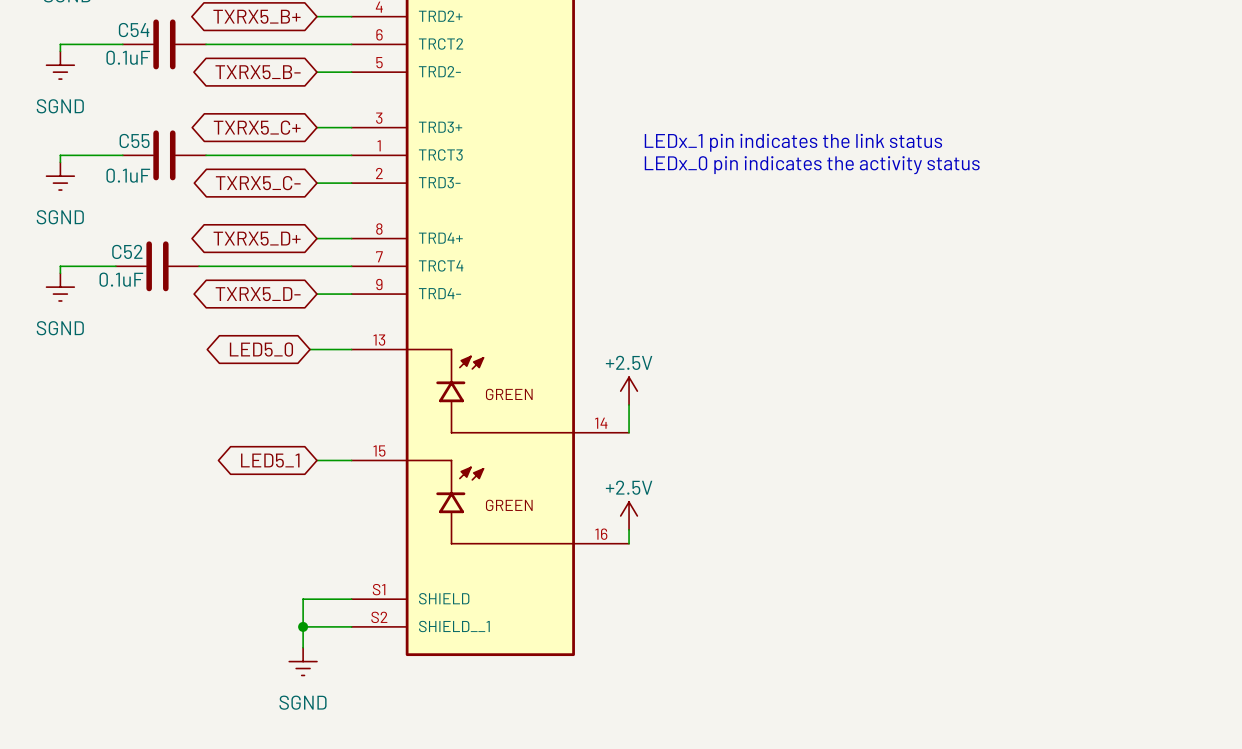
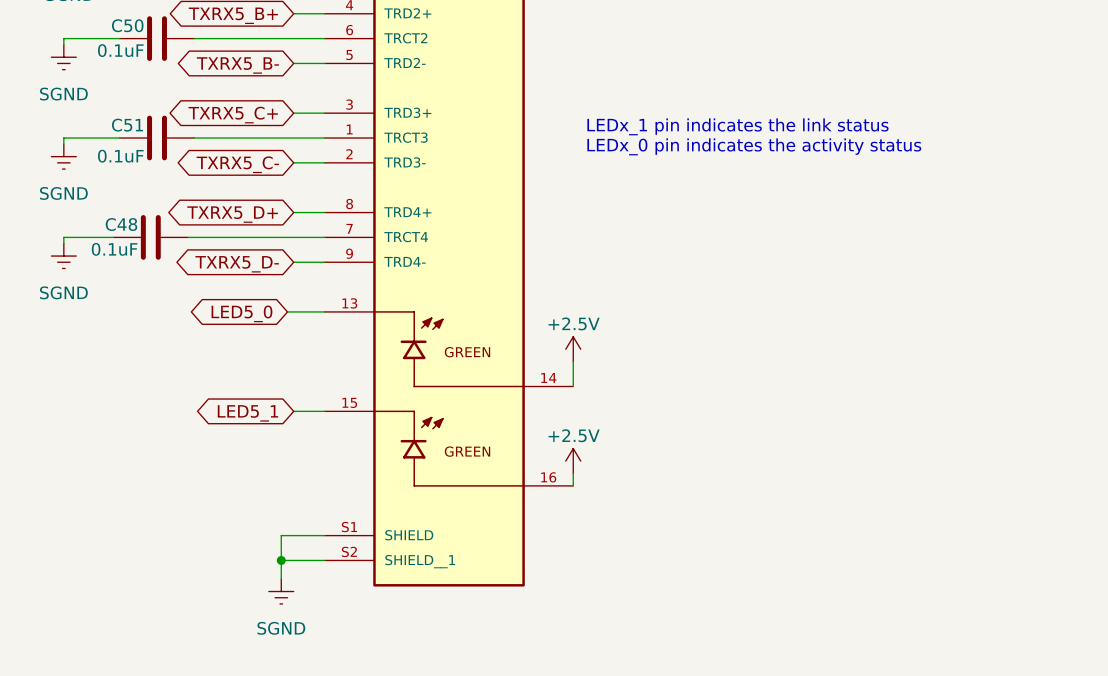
C54 name: C54 (134, 30) -> C50 (127, 25)
C55 name: C55 (134, 140) -> C51 (127, 125)
C52 name: C52 (127, 251) -> C48 (121, 224)

